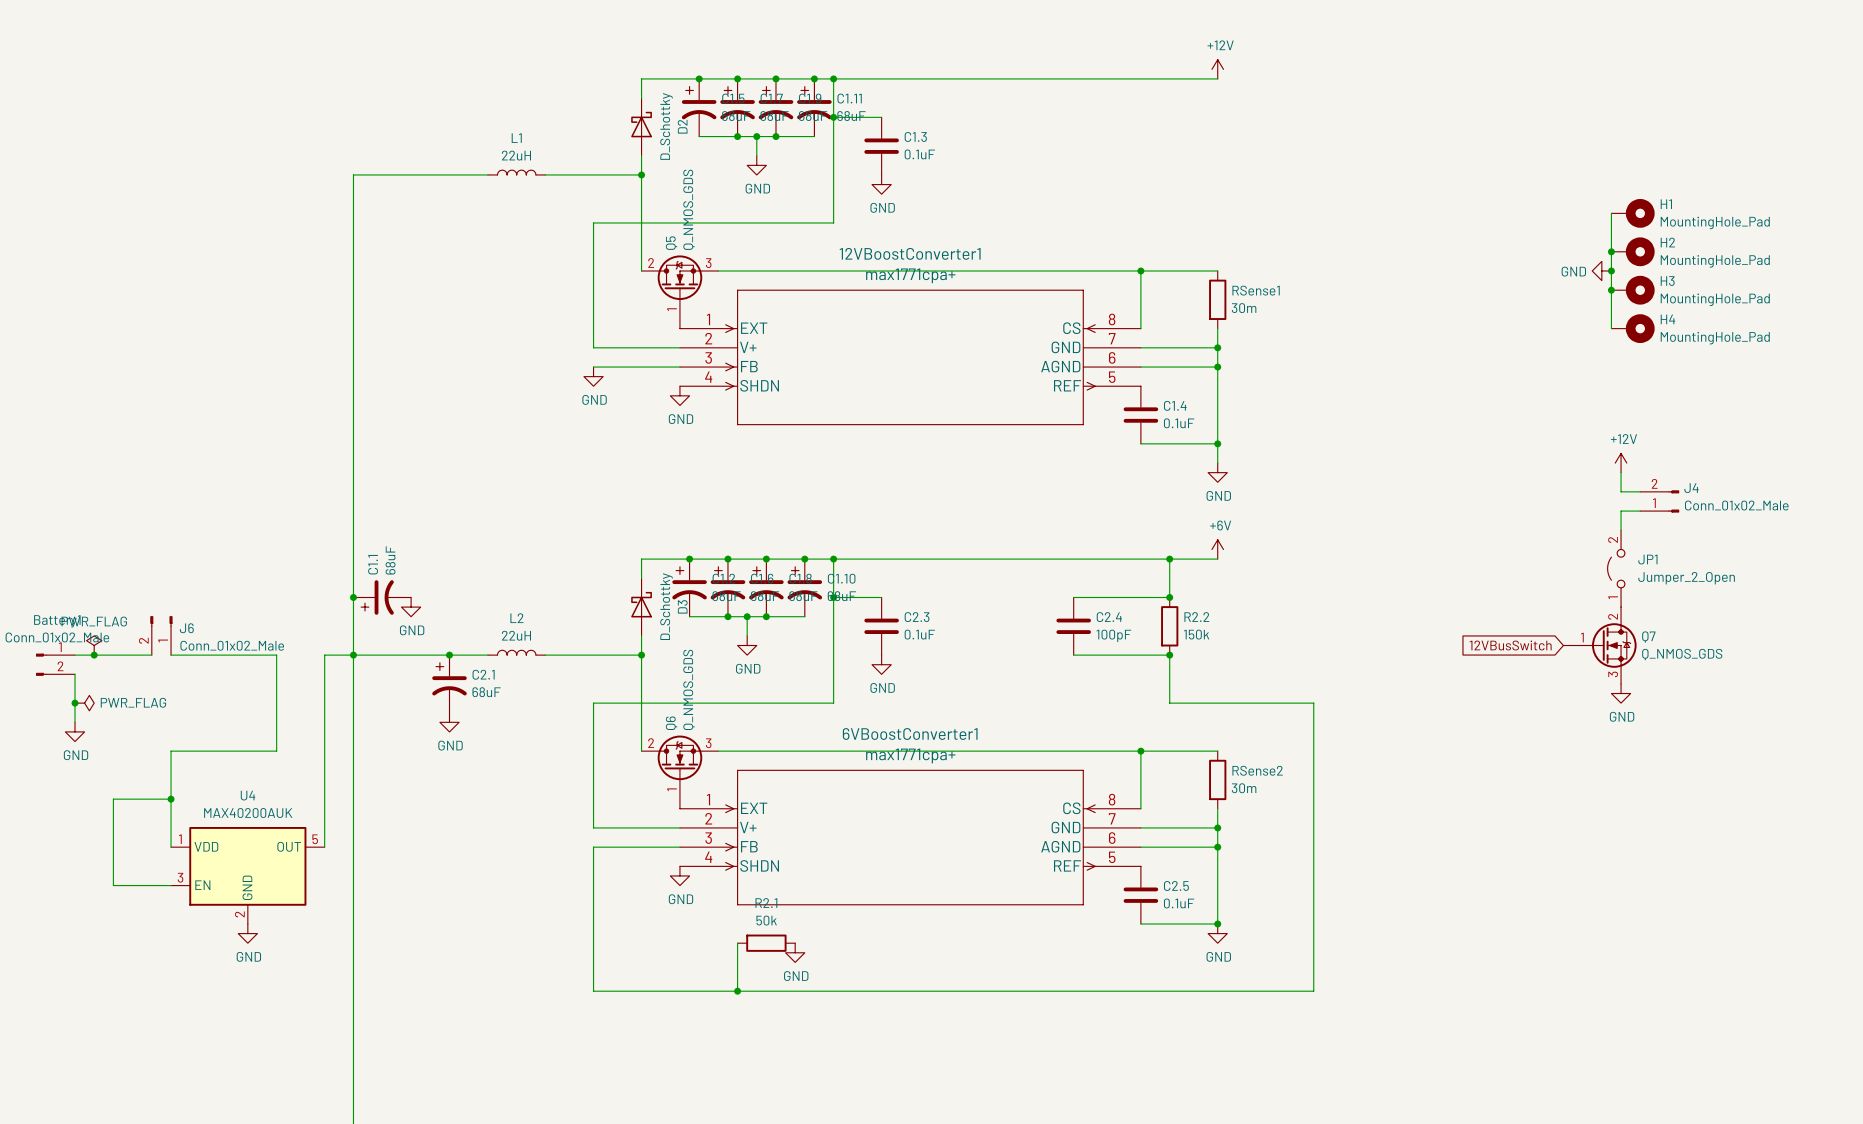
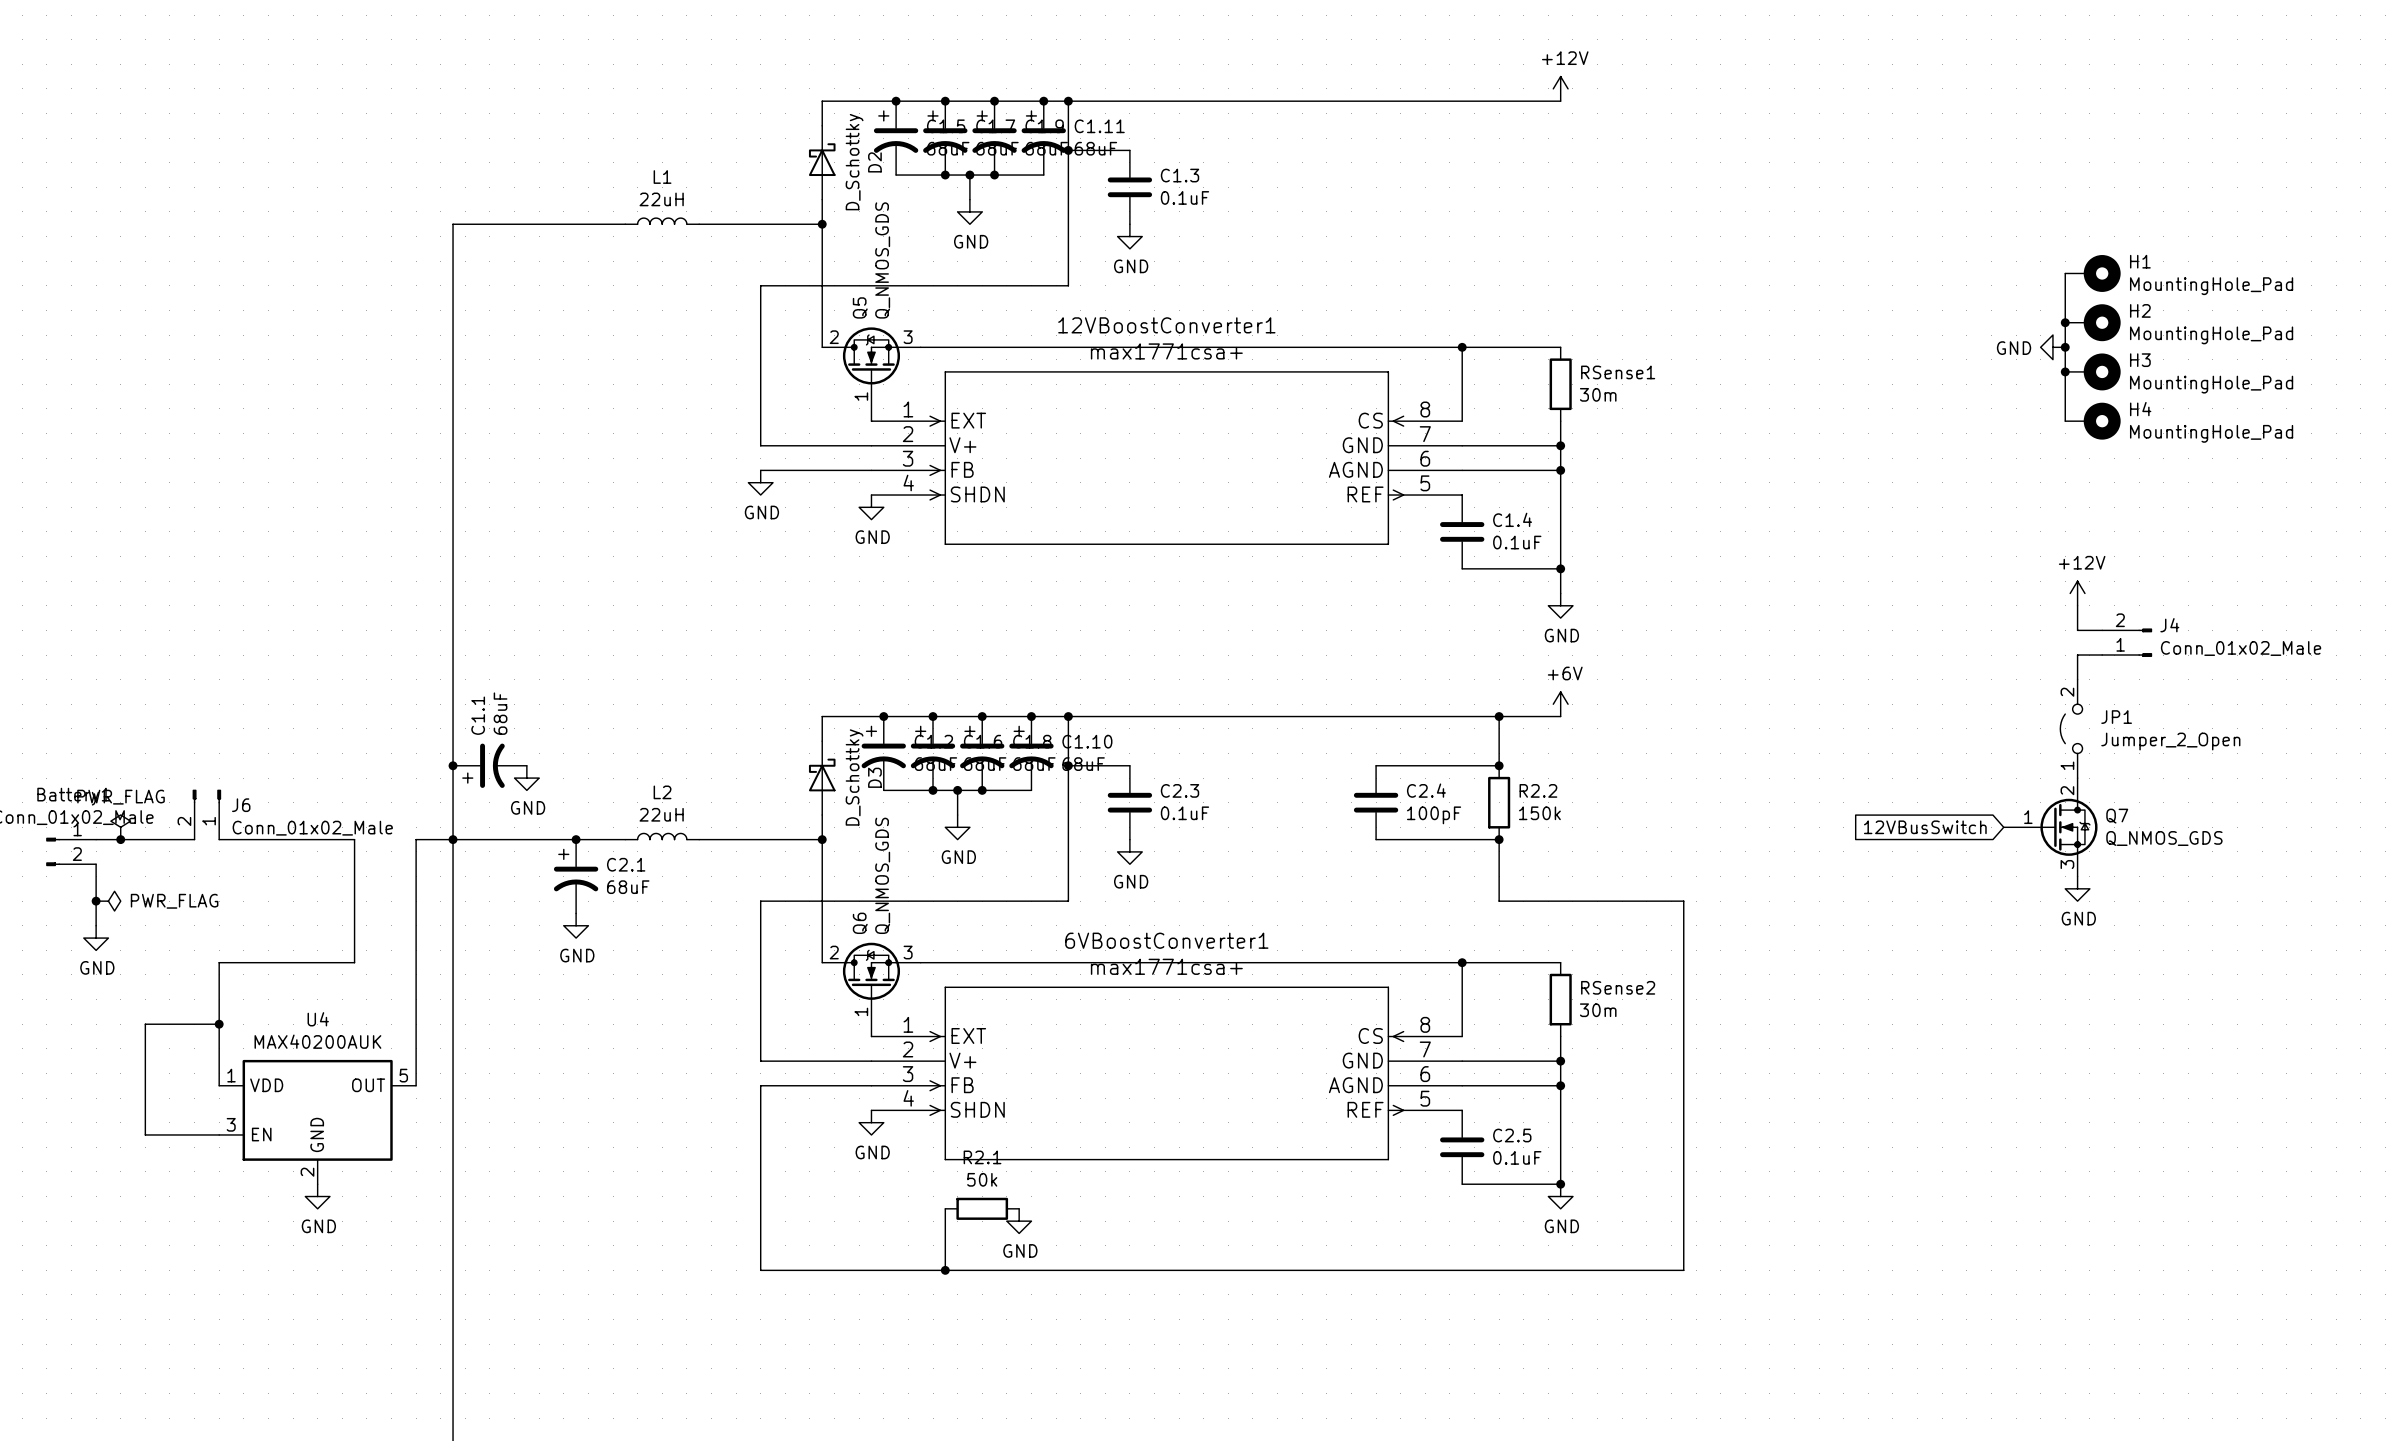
12VBoostConverter1 value: max1771cpa+ (910, 275) -> max1771csa+ (1166, 351)
6VBoostConverter1 value: max1771cpa+ (910, 755) -> max1771csa+ (1166, 966)

